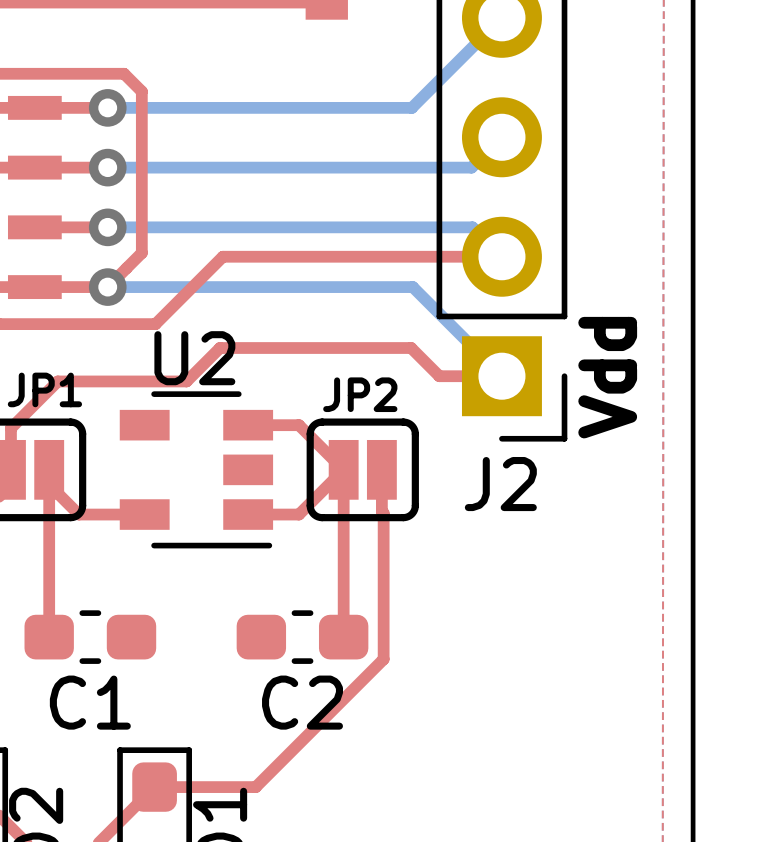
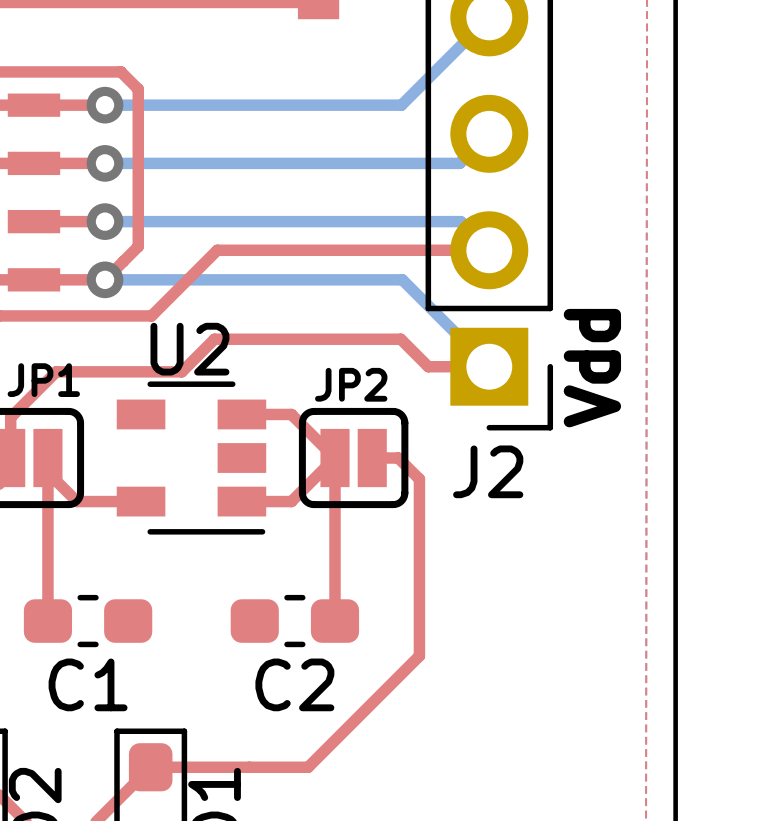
top track: (381, 469) (383, 659) (255, 787) -> (372, 458) (398, 458) (419, 479) (419, 655) (308, 767) (249, 767)

